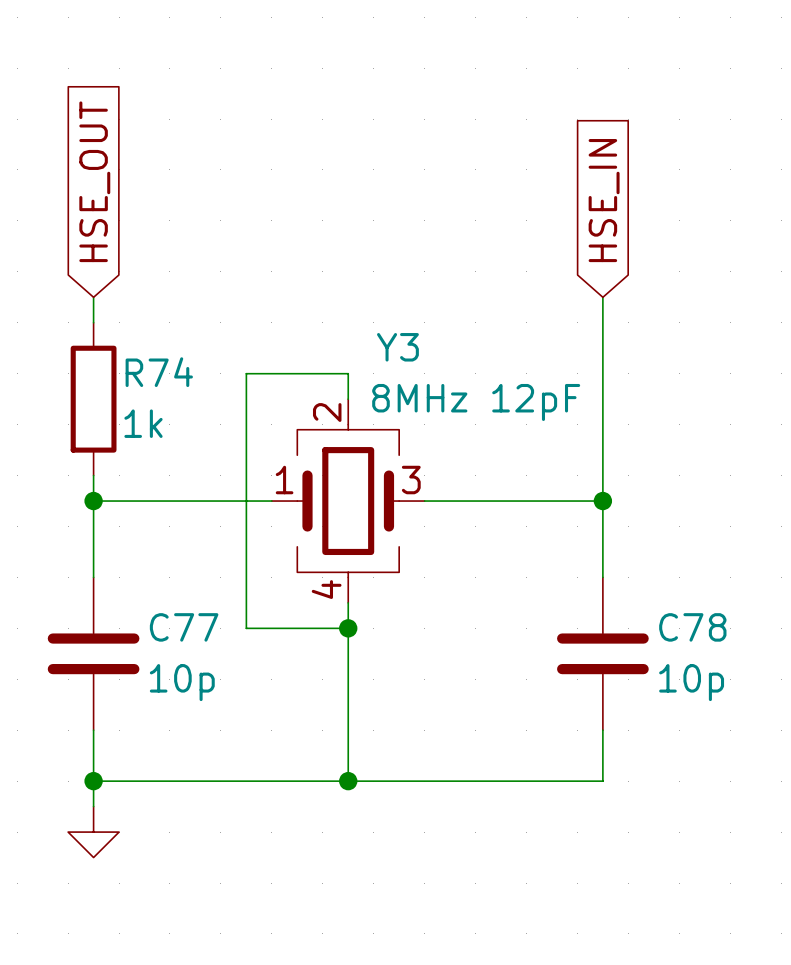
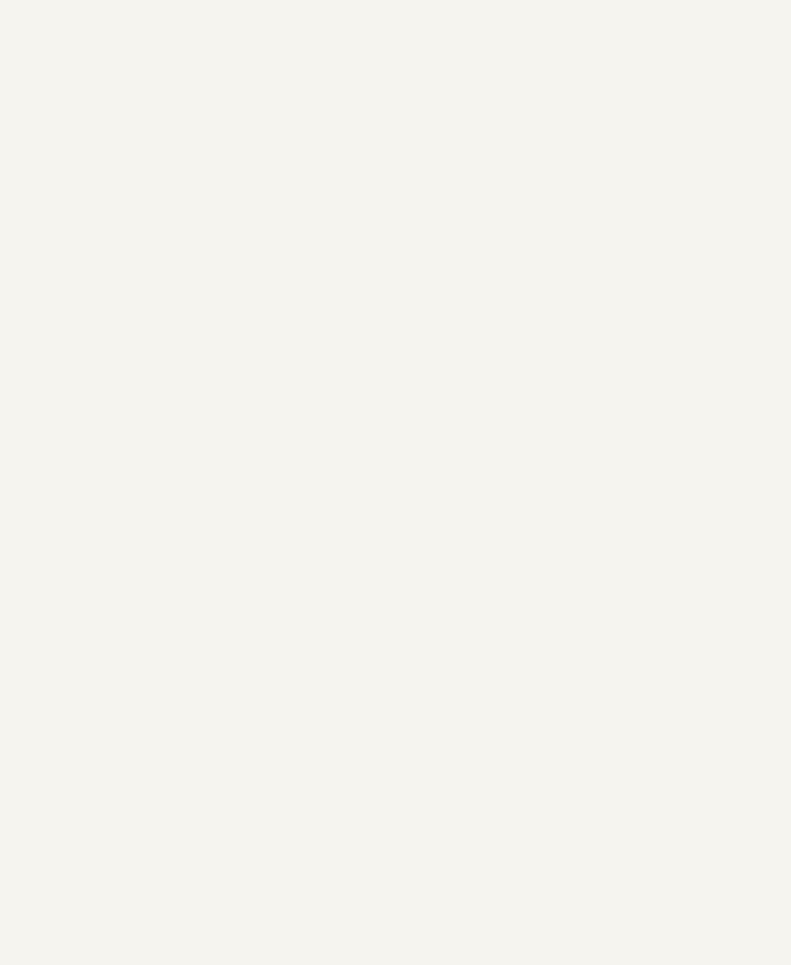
global label: HSE_OUT (94, 181) -> none
global label: HSE_IN (604, 200) -> none
wire: (93, 297) (93, 322) -> none
wire: (602, 297) (602, 577) -> none
R74: 1k (93, 399) -> none
wire: (348, 399) (348, 373) (246, 373) (246, 628) (348, 628) -> none
wire: (93, 475) (93, 577) -> none
wire: (93, 501) (271, 501) -> none
junction: (93, 501) -> none
Y3: 8MHz 12pF (348, 501) -> none
wire: (424, 501) (602, 501) -> none
junction: (602, 501) -> none
wire: (348, 602) (348, 781) -> none
junction: (348, 628) -> none
C77: 10p (93, 653) -> none
C78: 10p (602, 653) -> none
wire: (93, 730) (93, 806) -> none
wire: (602, 730) (602, 781) (93, 781) -> none
junction: (93, 781) -> none
junction: (348, 781) -> none
power symbol: (93, 832) -> none

